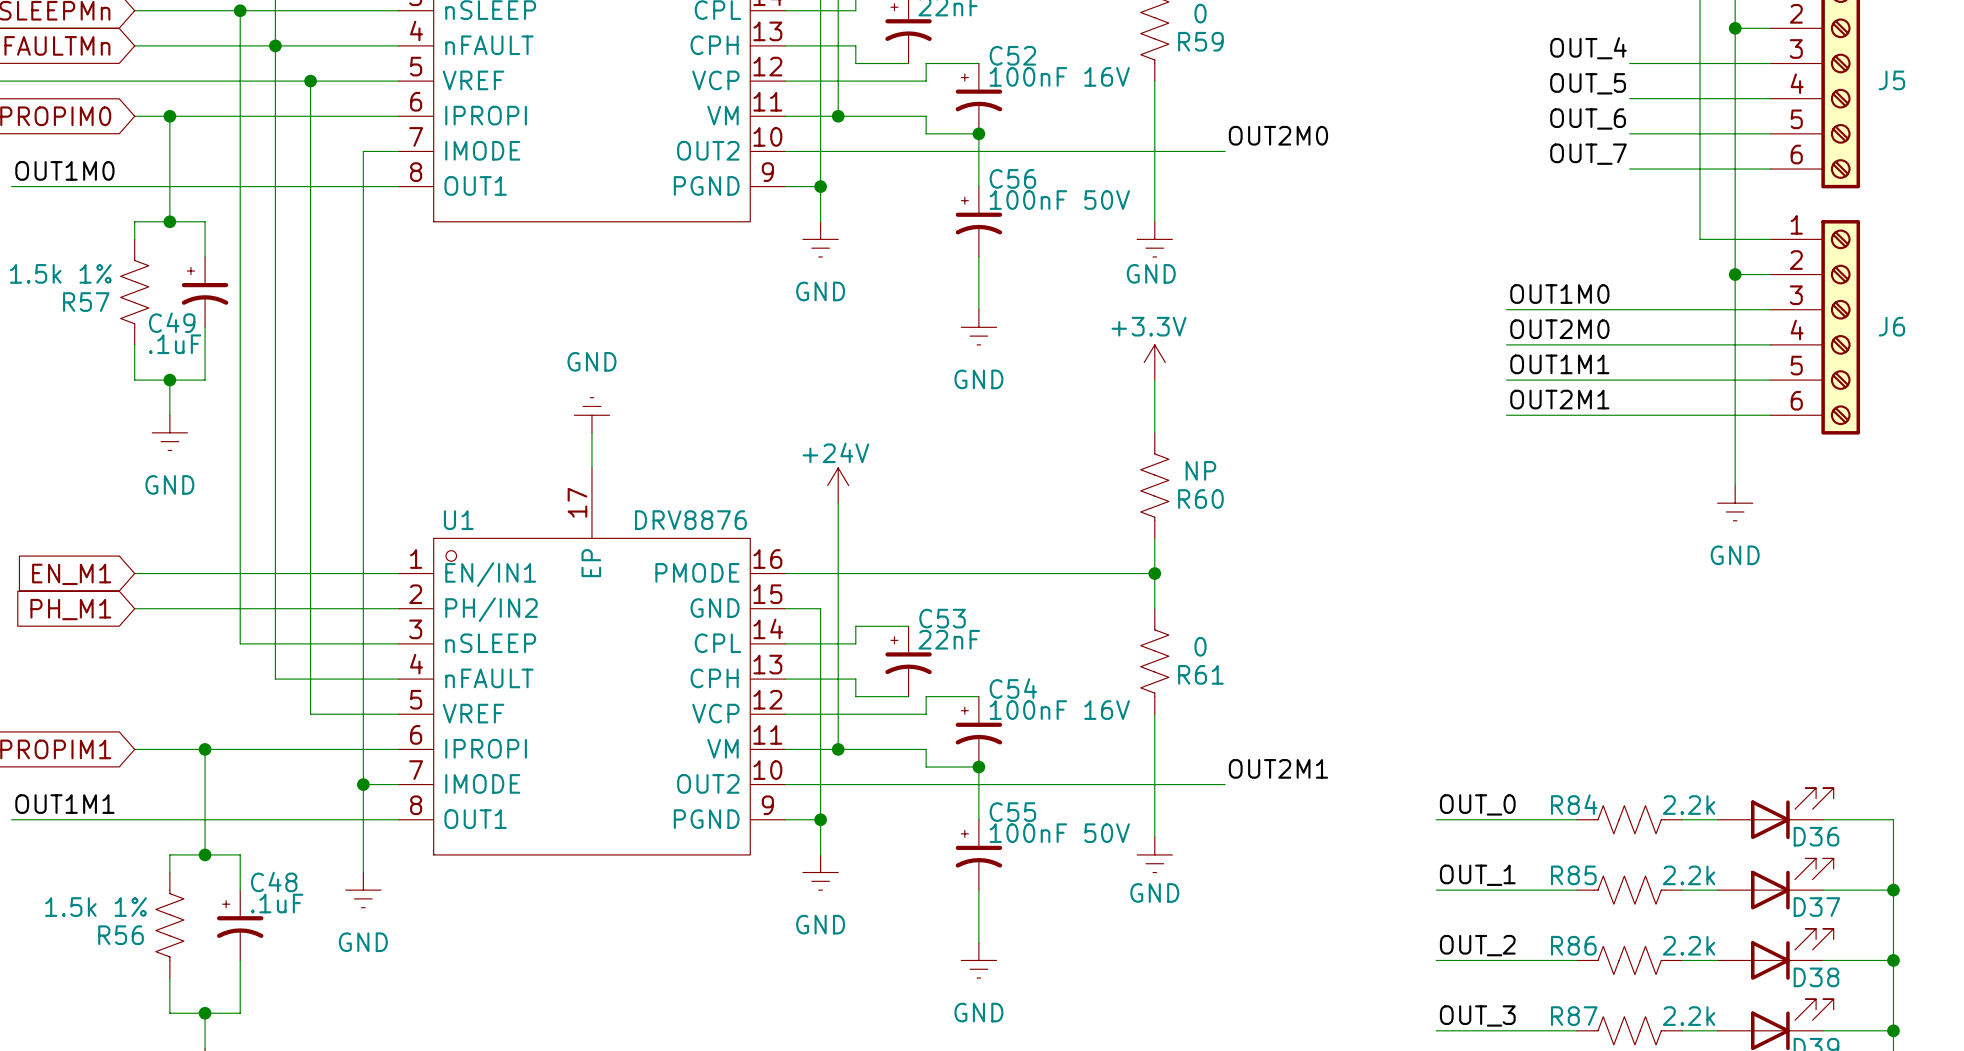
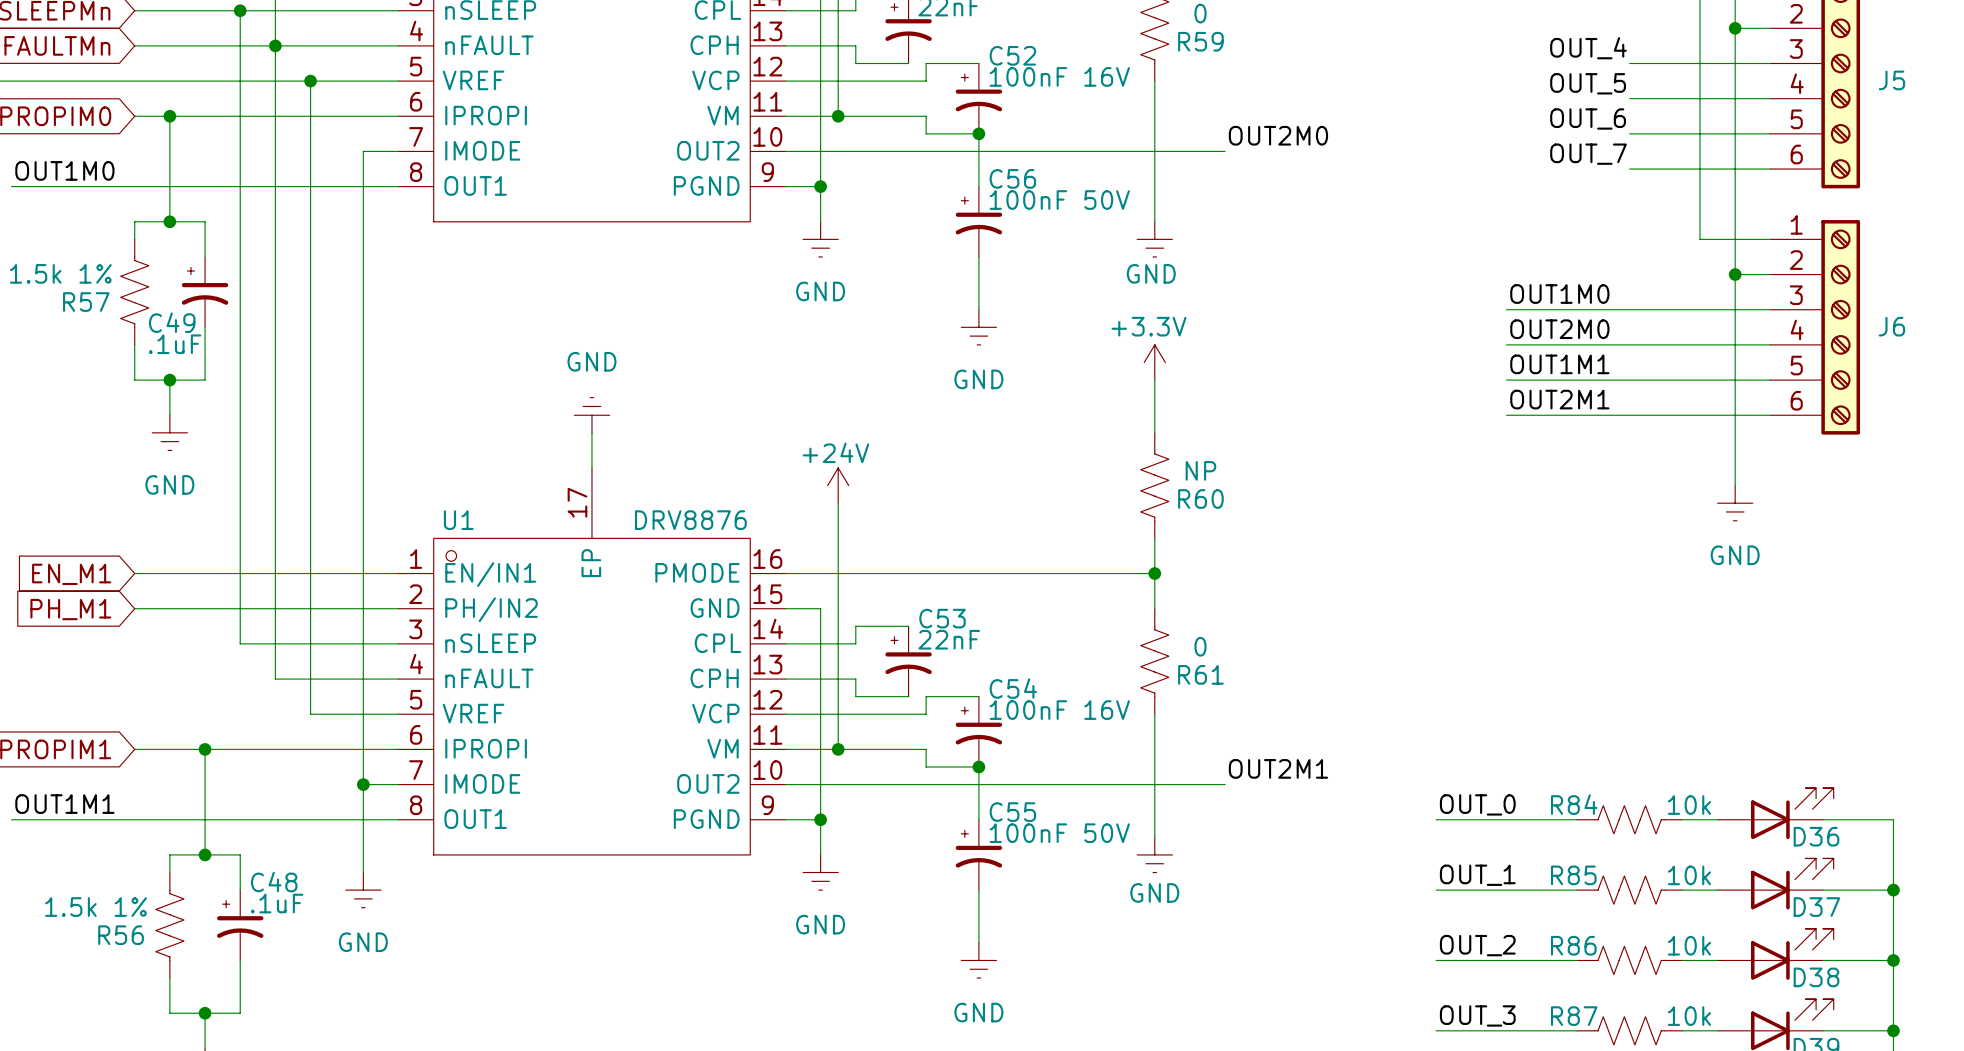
R84 value: 2.2k (1689, 805) -> 10k (1689, 805)
R85 value: 2.2k (1689, 875) -> 10k (1689, 875)
R86 value: 2.2k (1689, 945) -> 10k (1689, 945)
R87 value: 2.2k (1689, 1016) -> 10k (1689, 1016)

